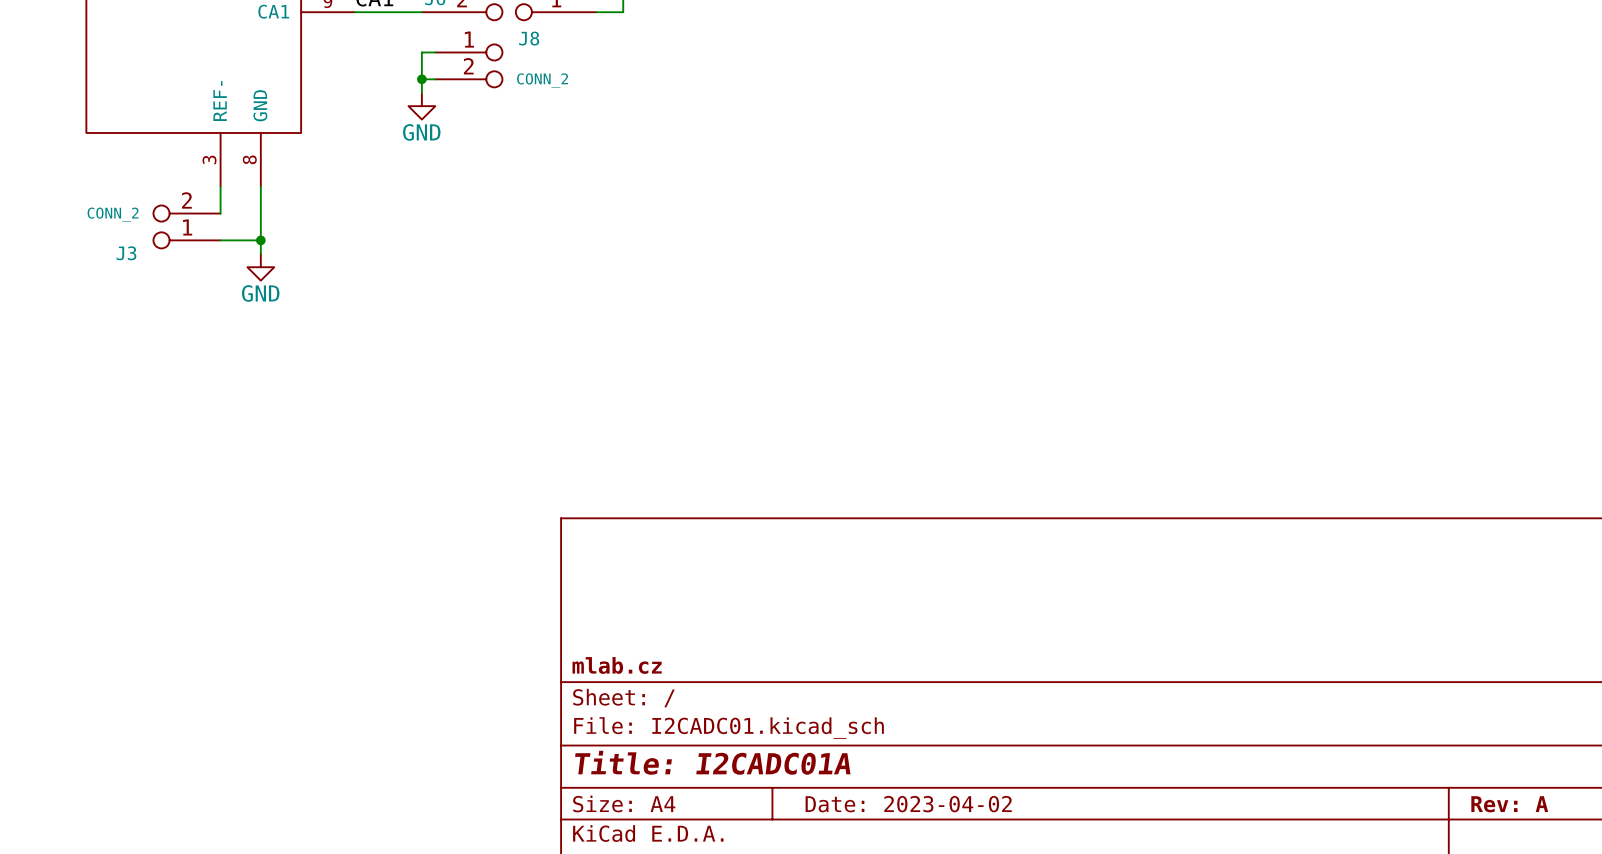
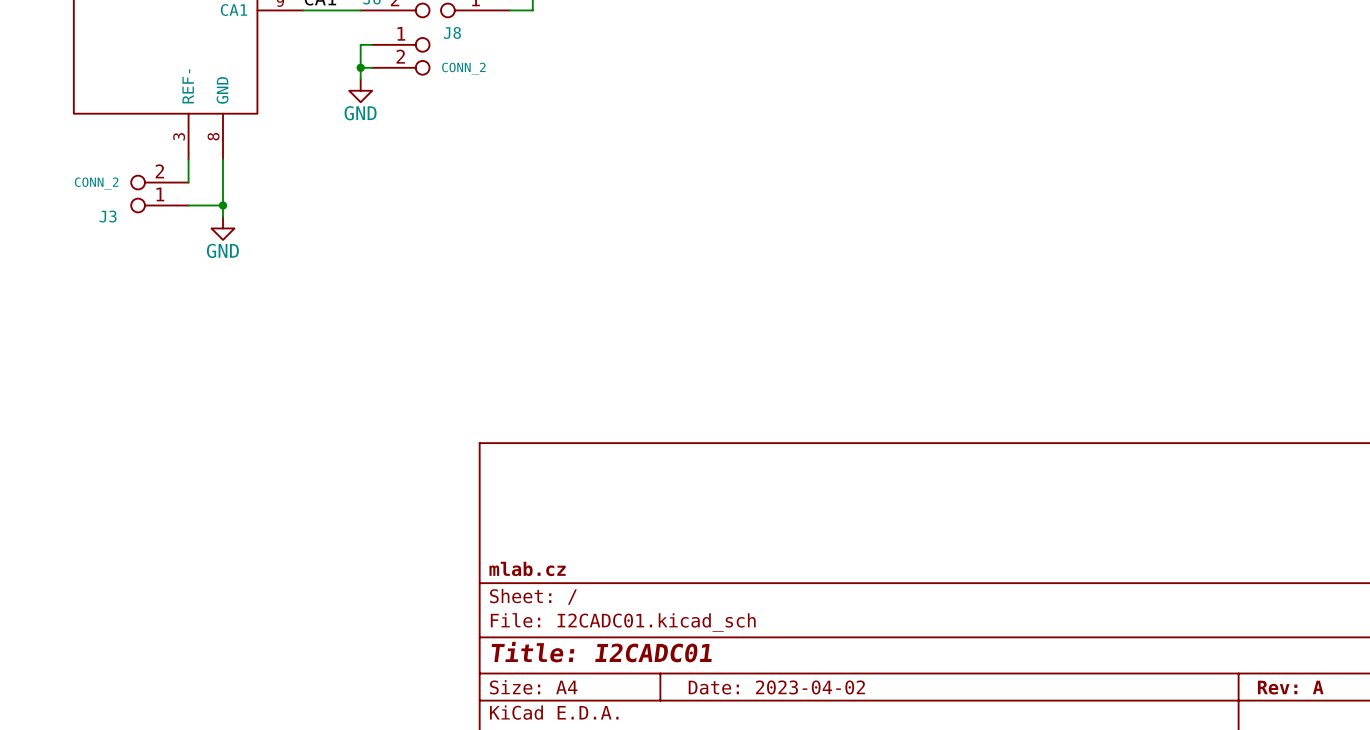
title block: Title: I2CADC01A (712, 762) -> Title: I2CADC01 (601, 652)

